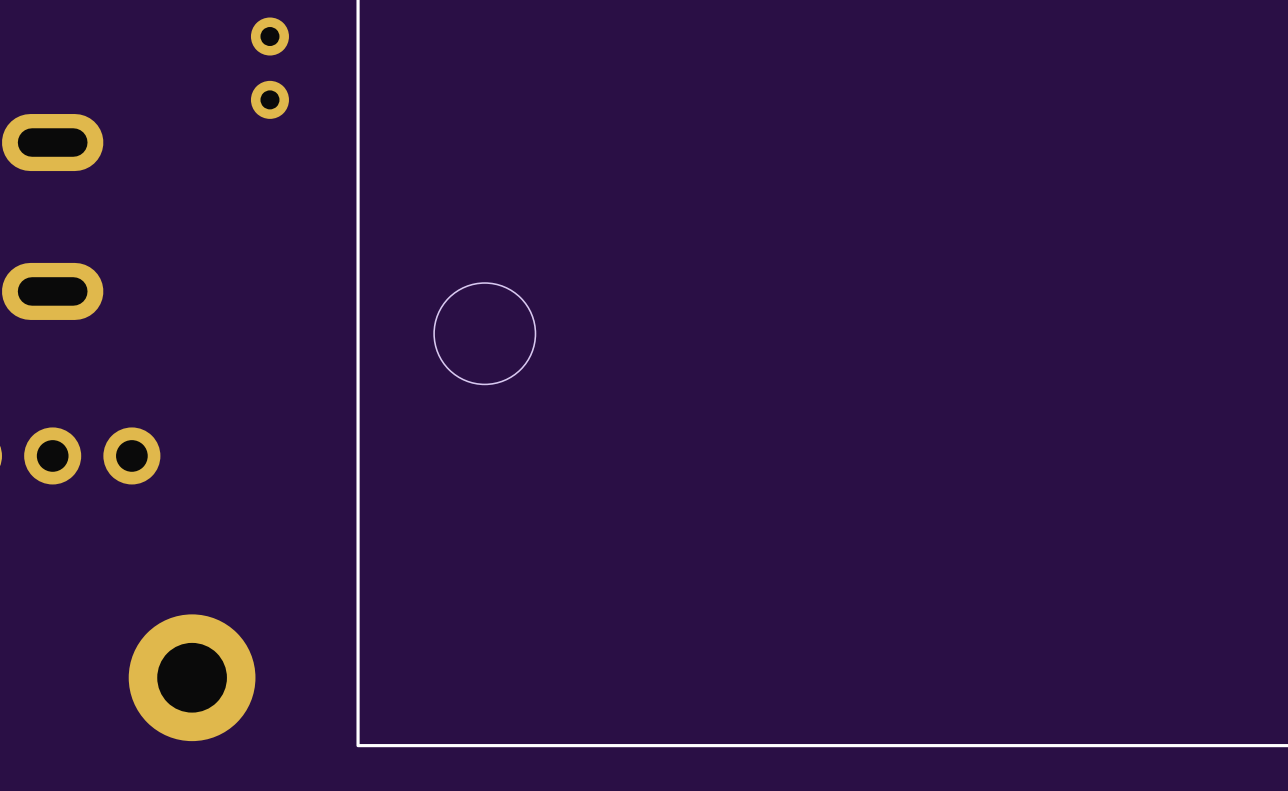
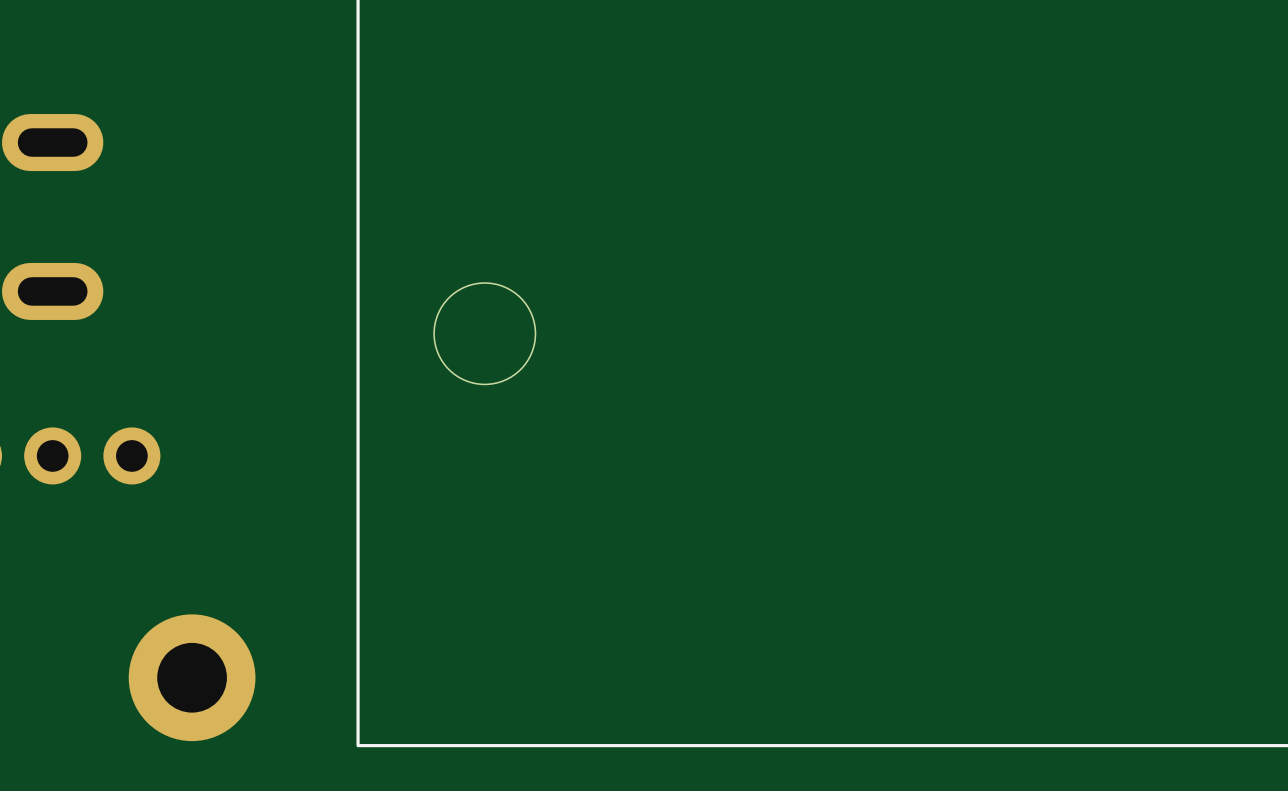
part: (269, 68) -> none

